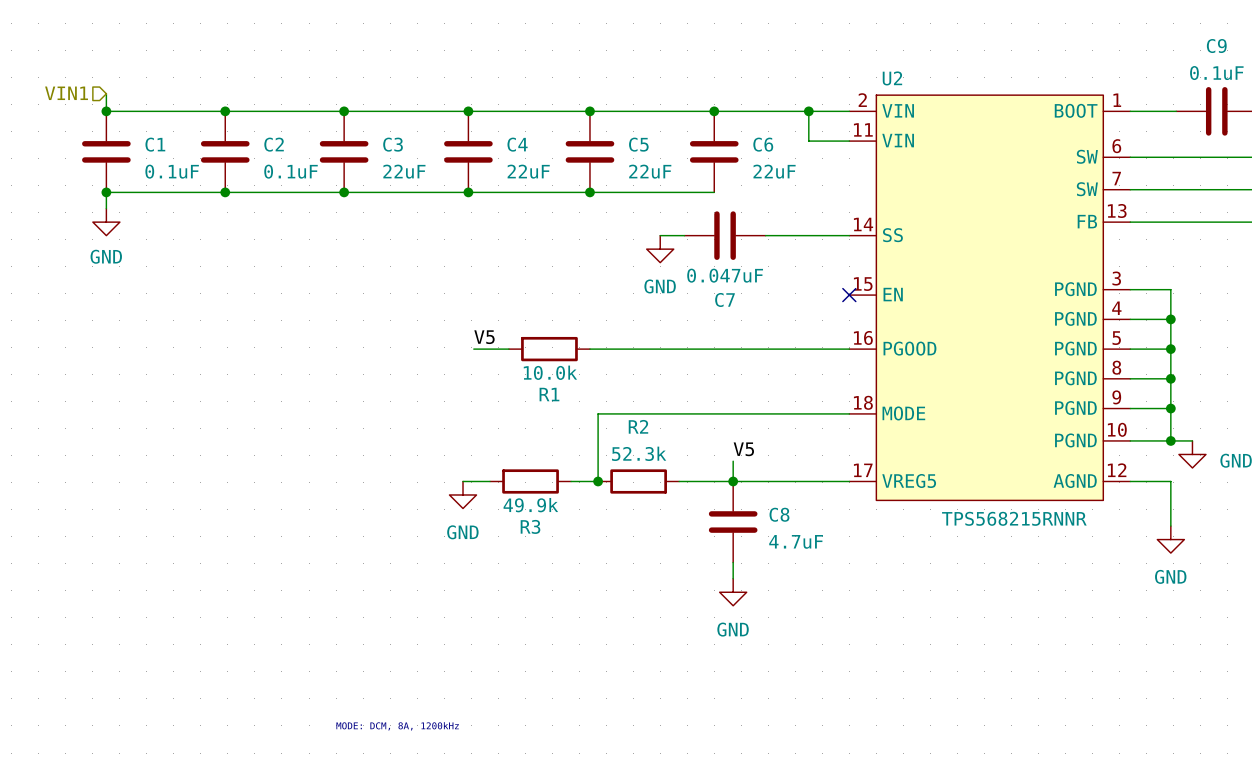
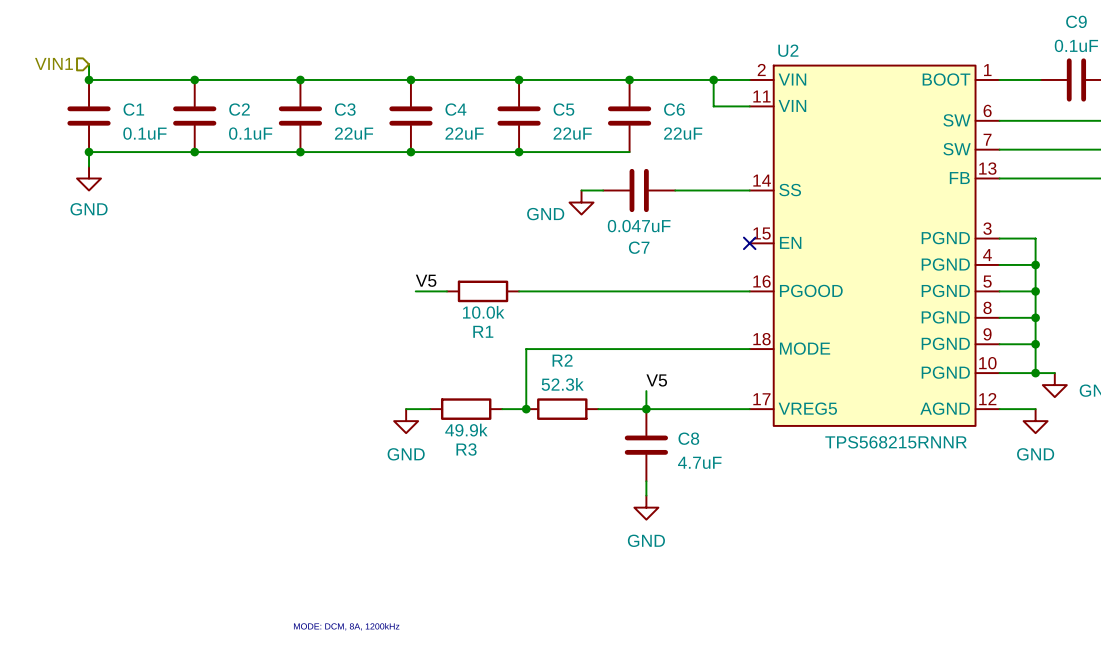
power symbol text position: GND (660, 286) -> GND (545, 214)
wire: (1170, 481) (1170, 526) -> none
power symbol position: GND (1170, 539) -> GND (1035, 421)

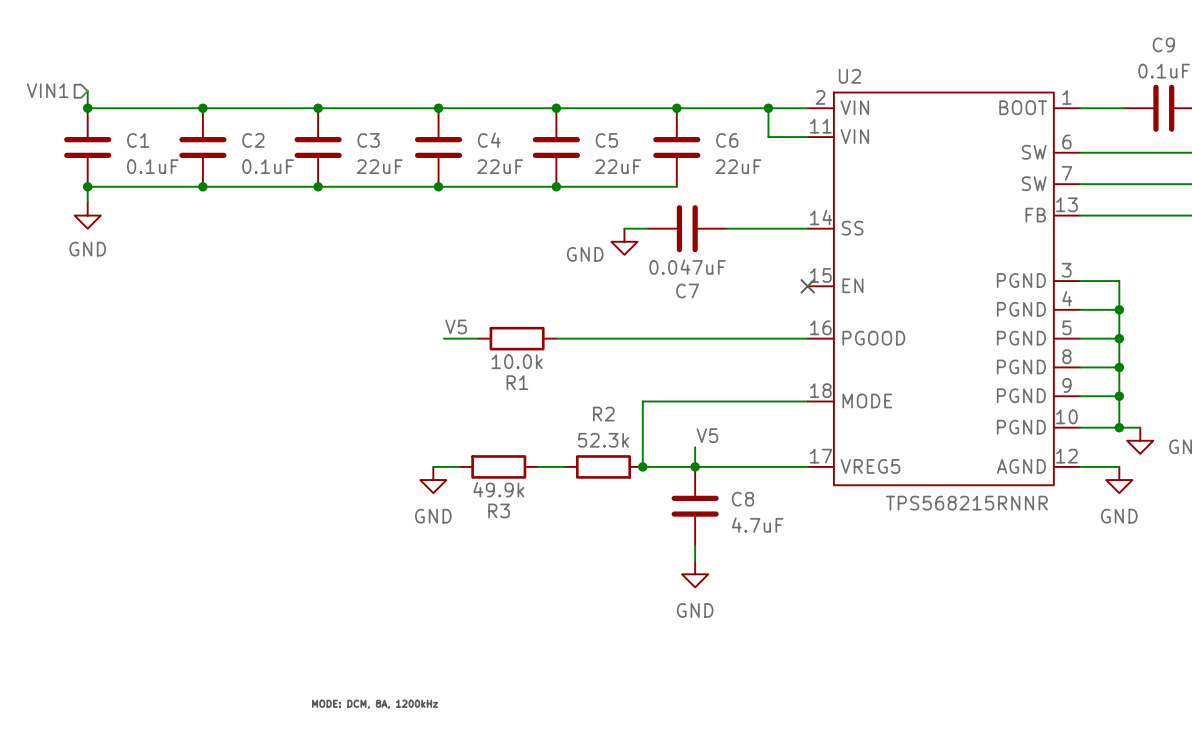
wire: (598, 349) (526, 349) (526, 409) -> (642, 401) (642, 466)
junction: (526, 409) -> none
junction: none -> (642, 466)

